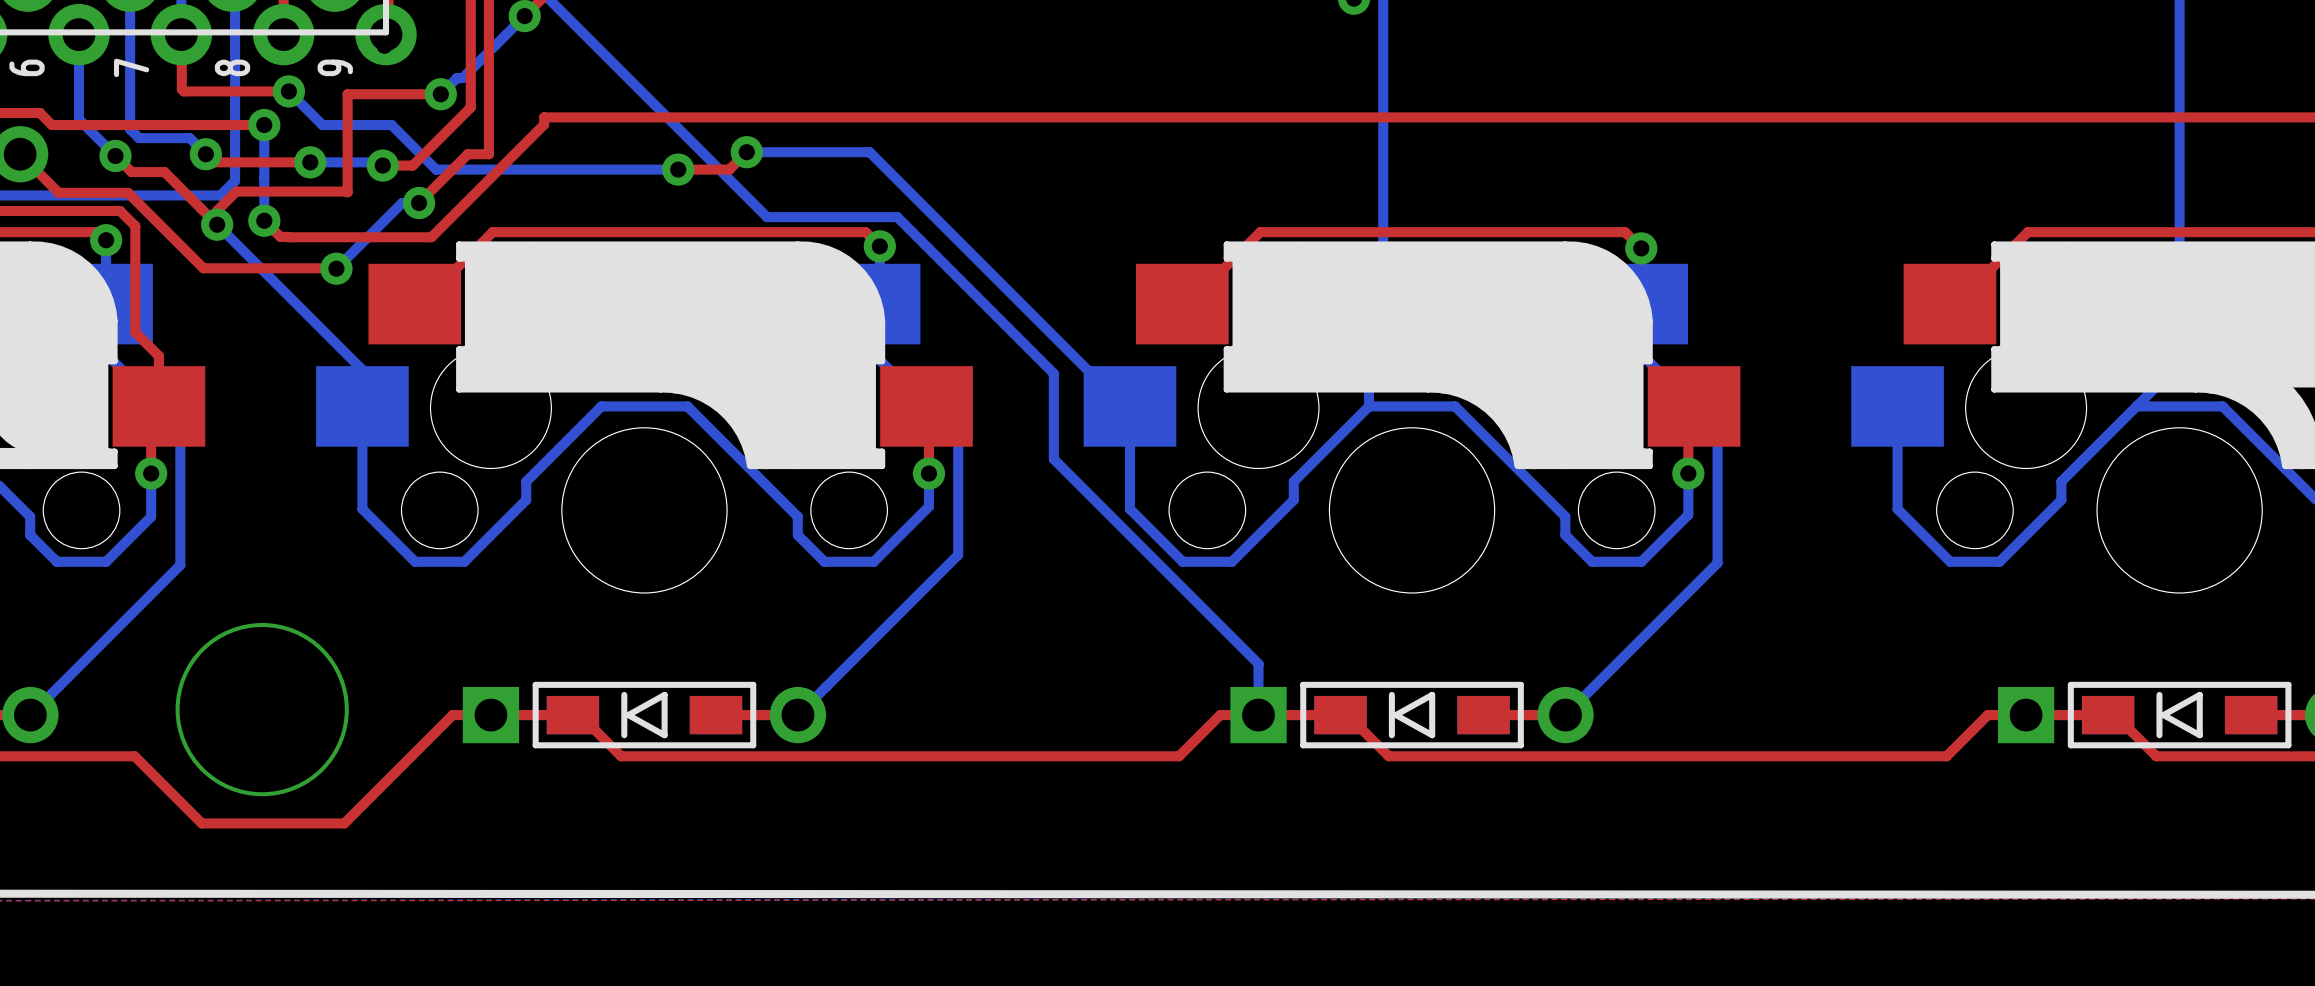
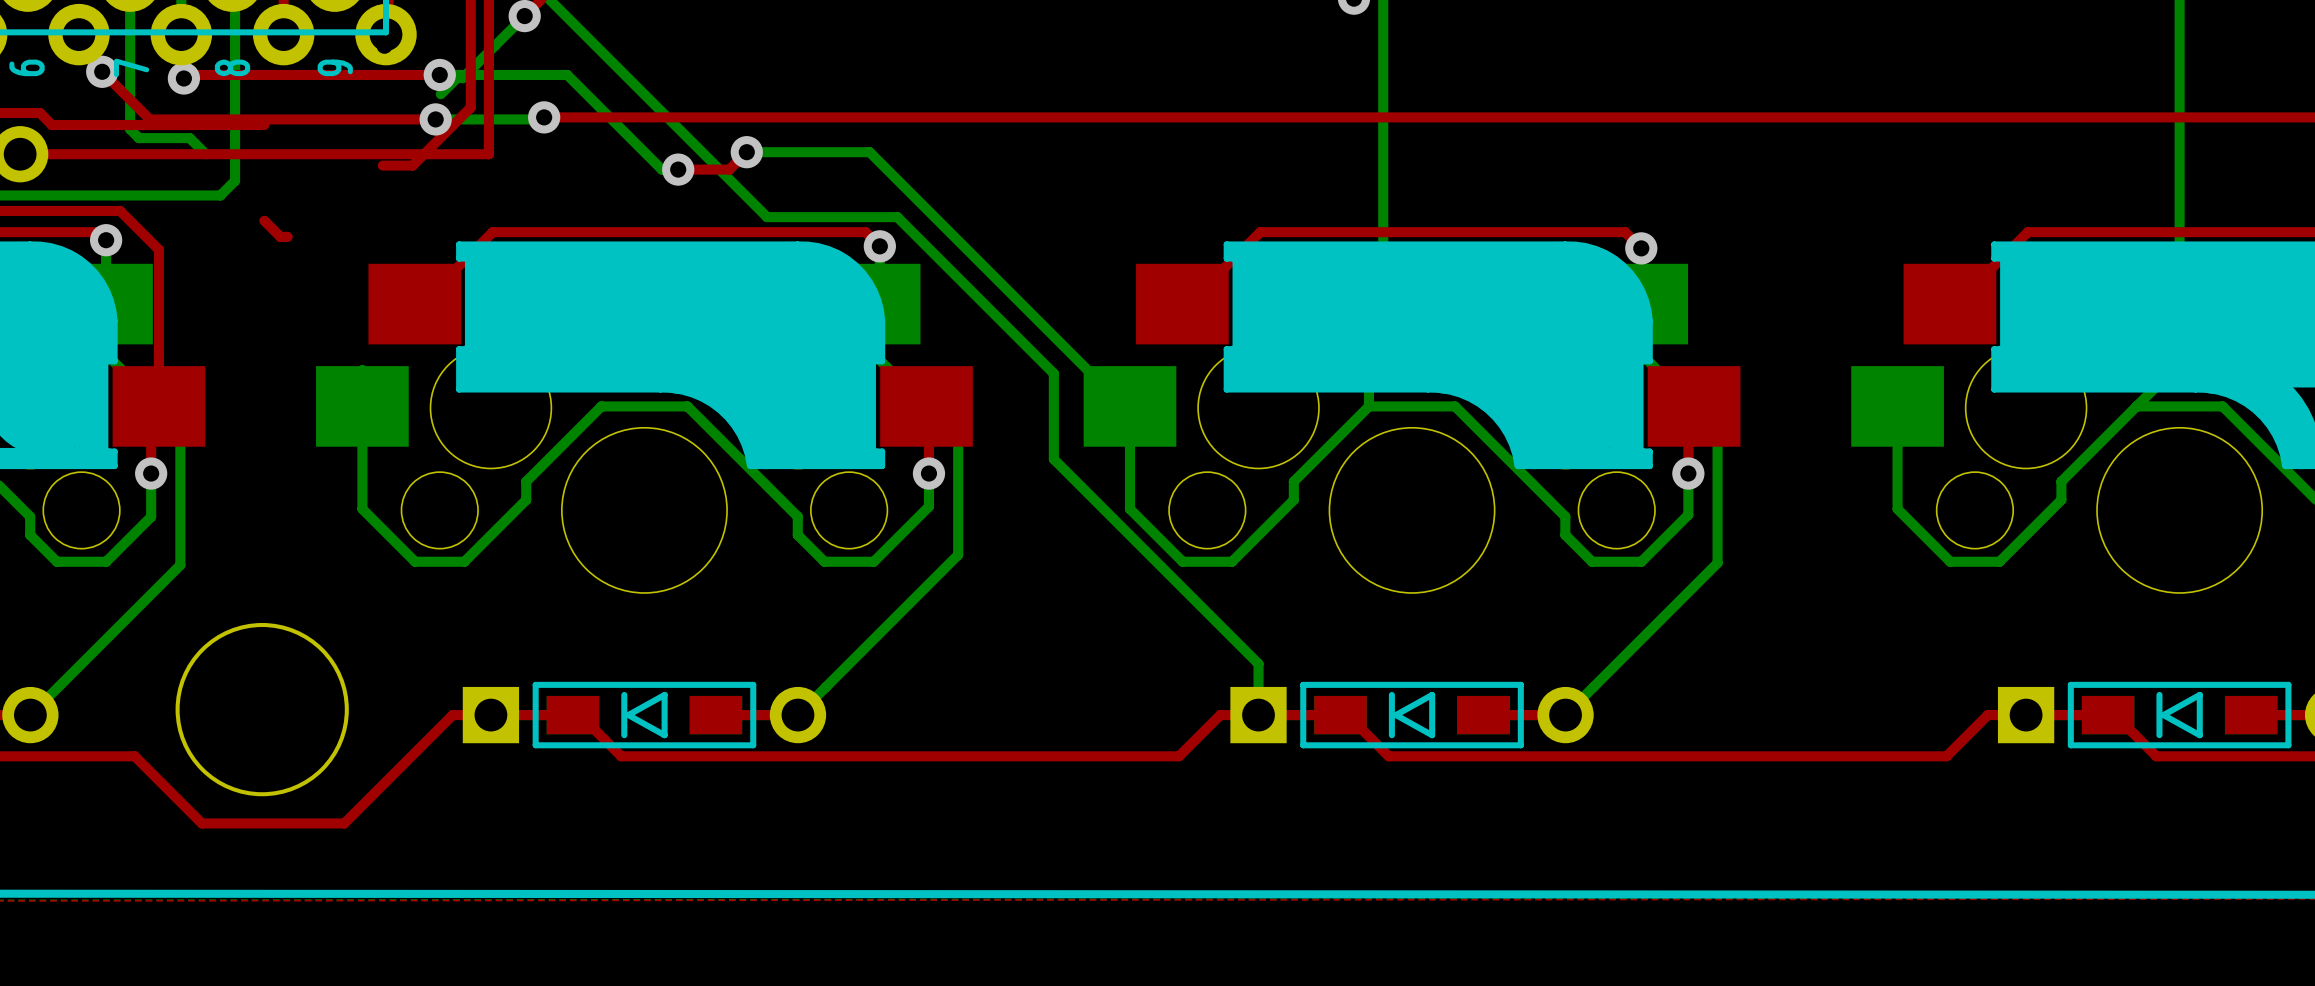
bottom track: (78, 34) (78, 119) (115, 155) -> none
top track: (181, 35) (181, 89) (183, 91) (288, 91) -> none
top track: none -> (102, 71) (149, 119) (435, 119)
via: none -> (102, 71)
top track: none -> (439, 74) (187, 74) (183, 78)
via: none -> (439, 74)
via: none -> (183, 78)
bottom track: (288, 91) (322, 125) (391, 125) (436, 169) (661, 169) -> (439, 74) (567, 74) (661, 169)
via: (288, 91) -> none
top track: (440, 94) (347, 94) (347, 192) (236, 191) (217, 210) (217, 224) (164, 172) (131, 172) (115, 155) -> none
via: (440, 94) -> none
bottom track: none -> (544, 117) (542, 119) (435, 119)
top track: (544, 117) (544, 124) (431, 237) (288, 237) -> none
via: none -> (544, 117)
via: none -> (435, 119)
bottom track: (264, 125) (264, 220) -> none
via: (264, 125) -> none
top track: (20, 154) (58, 192) (128, 192) (203, 268) (336, 268) -> (20, 154) (467, 154)
top track: (205, 154) (213, 162) (310, 162) (308, 163) -> none
via: (205, 154) -> none
top track: (467, 154) (419, 203) -> none
via: (115, 155) -> none
bottom track: (310, 162) (379, 162) (382, 165) -> none
via: (310, 162) -> none
via: (382, 165) -> none
bottom track: (419, 203) (402, 203) (336, 268) -> none
via: (419, 203) -> none
via: (264, 220) -> none
bottom track: (217, 224) (362, 369) -> none
via: (217, 224) -> none
top track: (135, 226) (135, 332) (158, 356) -> (135, 226) (158, 249) (158, 356)
via: (336, 268) -> none

